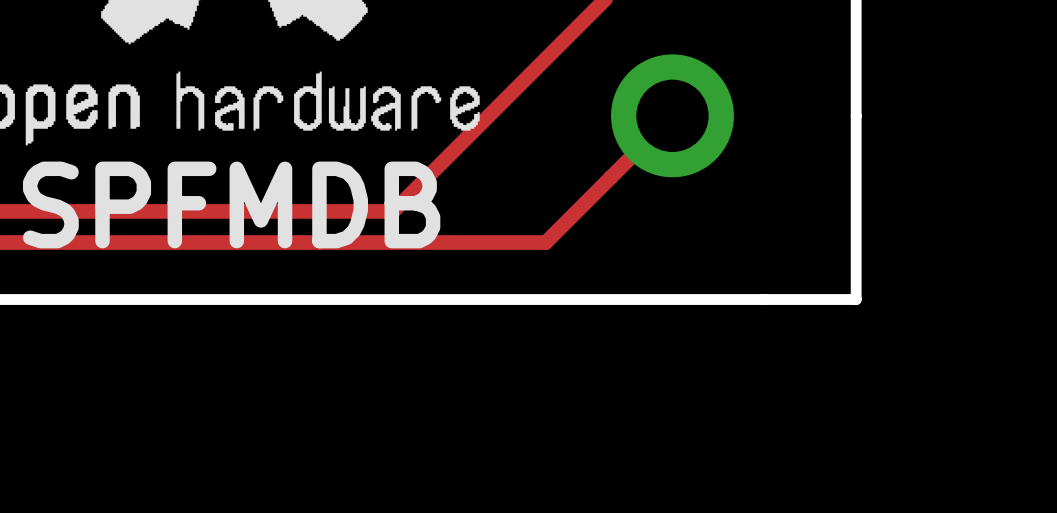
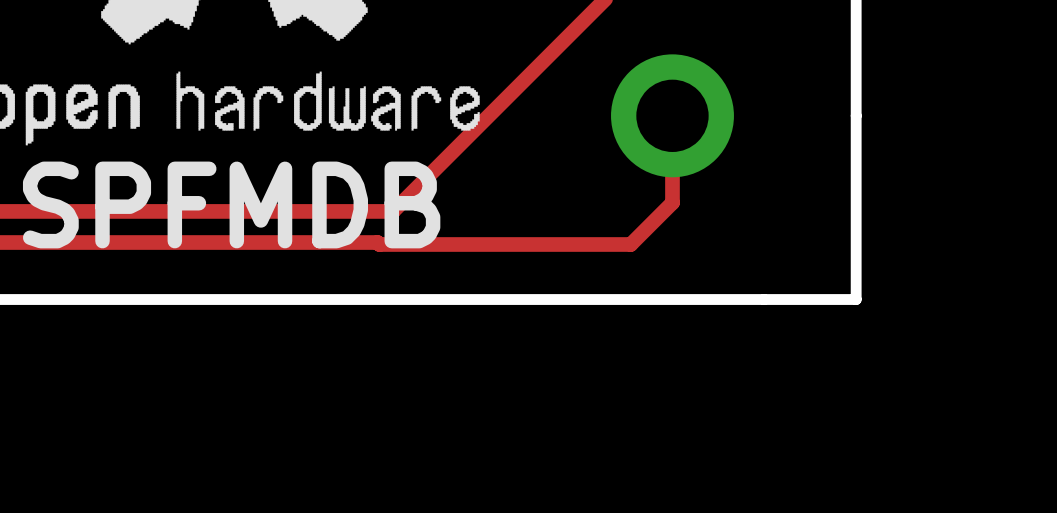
track: (672, 115) (545, 242) (377, 242) -> (672, 115) (672, 202) (630, 244) (379, 244) (377, 242)

